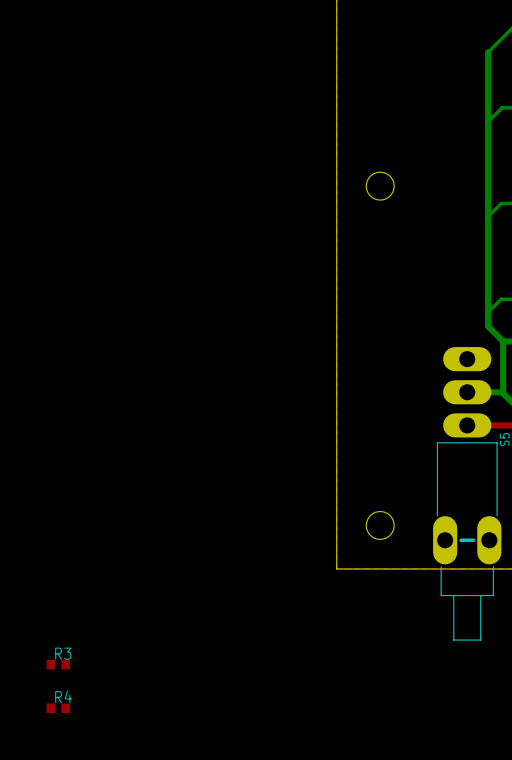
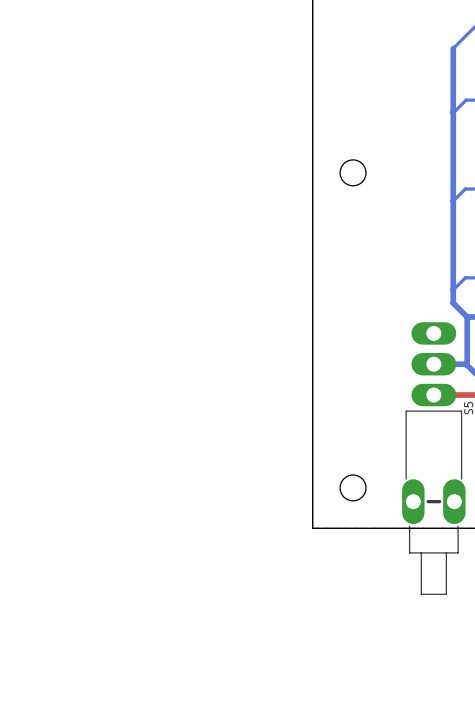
R3: (58, 664) -> none
R4: (58, 708) -> none

